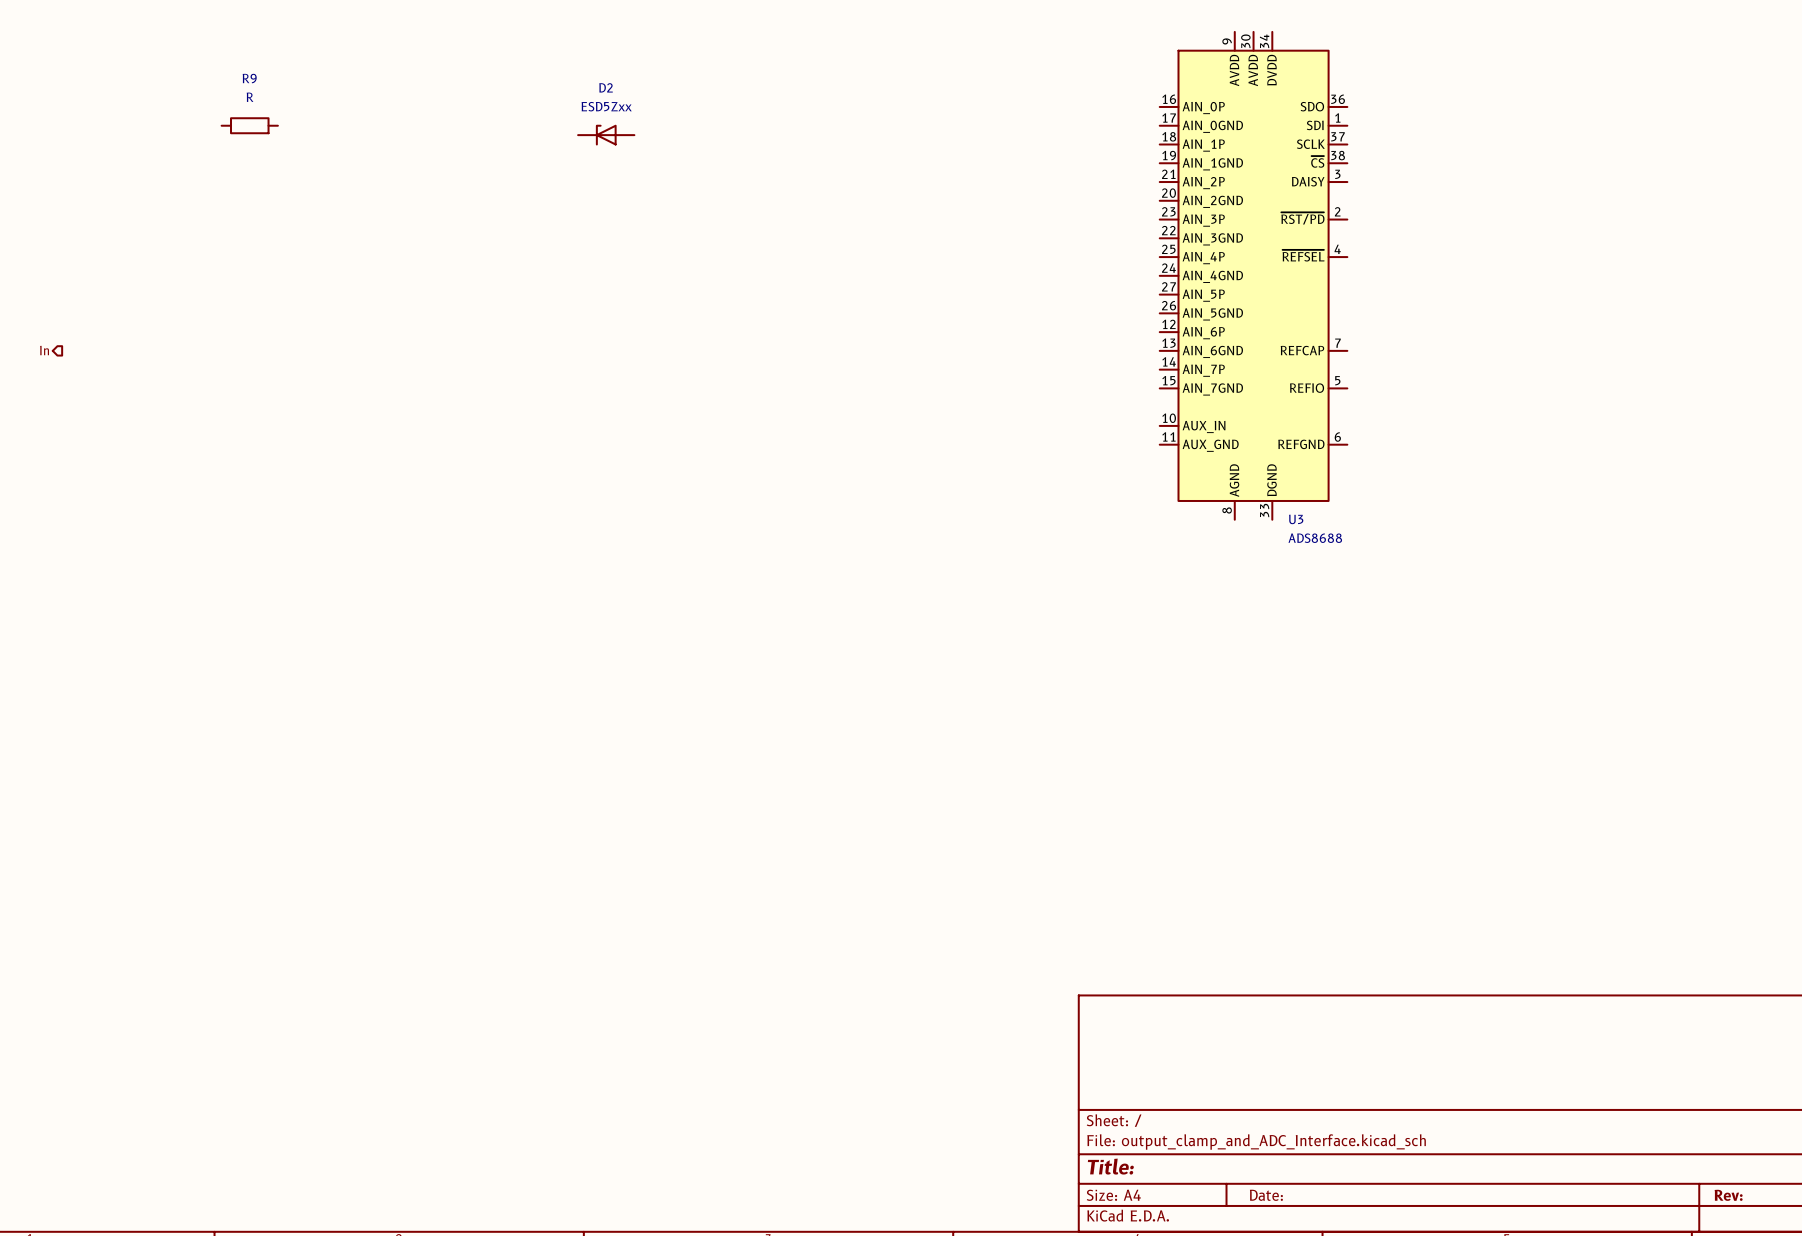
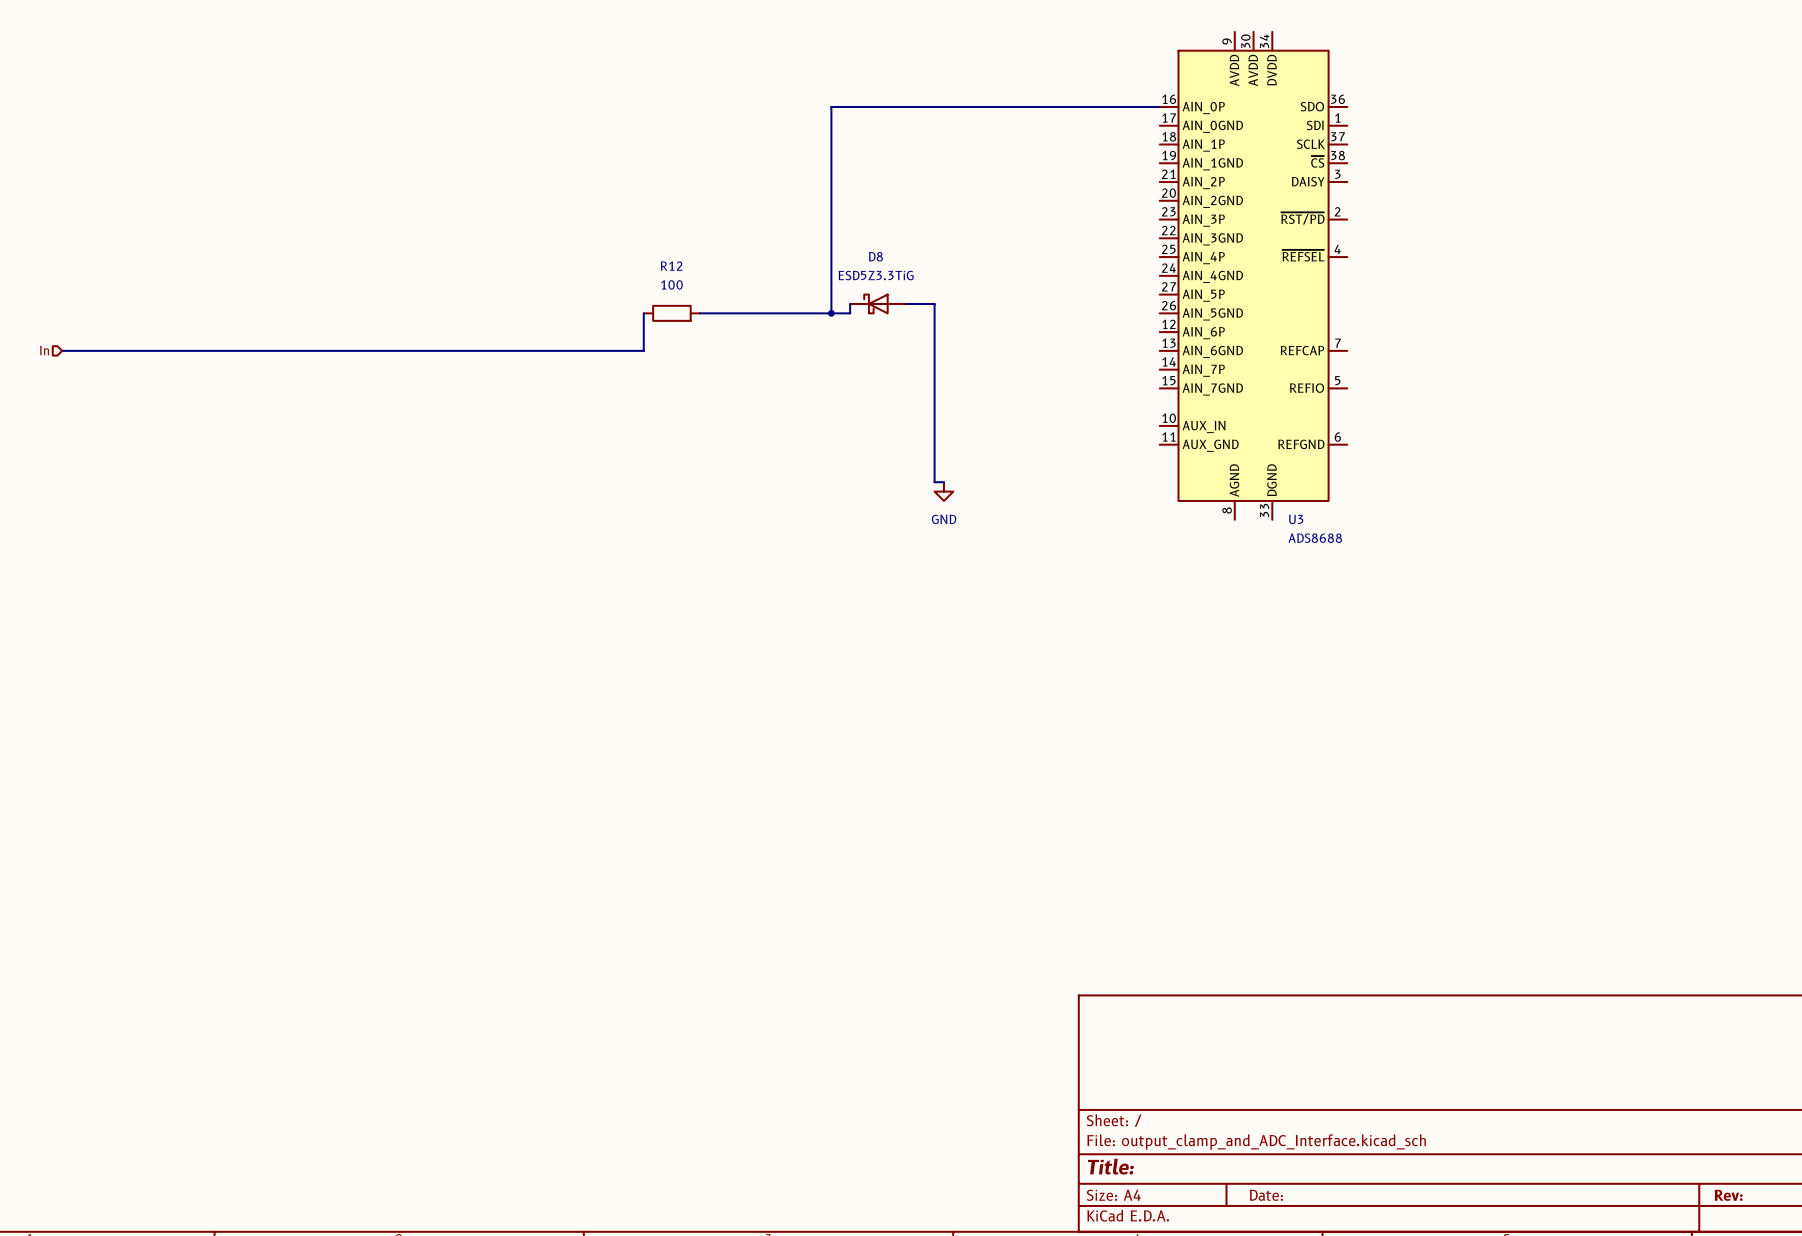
wire: none -> (1159, 106) (831, 106) (831, 313)
R9: R (249, 125) -> none
D2: ESD5Zxx (606, 135) -> none
wire: none -> (850, 303) (850, 313) (700, 313)
D8: none -> ESD5Z3.3TiG (878, 303)
wire: none -> (906, 303) (934, 303) (934, 482) (943, 482)
wire: none -> (643, 313) (643, 350) (62, 350)
R12: none -> 100 (671, 313)
junction: none -> (831, 313)
hierarchical label shape: output (44, 350) -> input (44, 350)
power symbol: none -> GND (943, 491)

